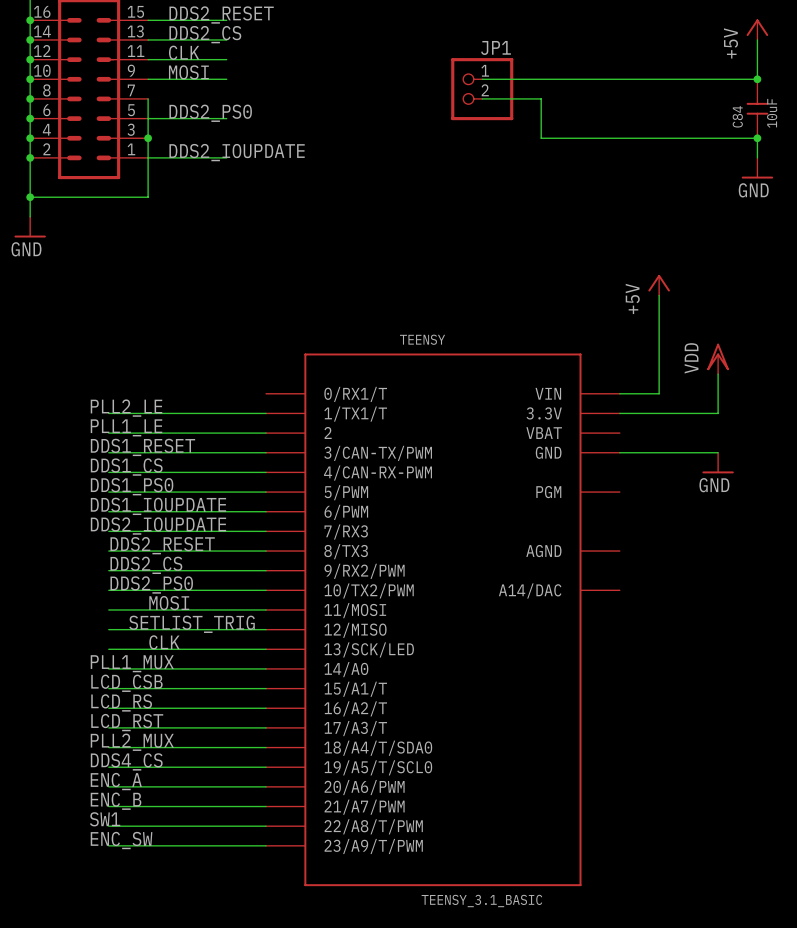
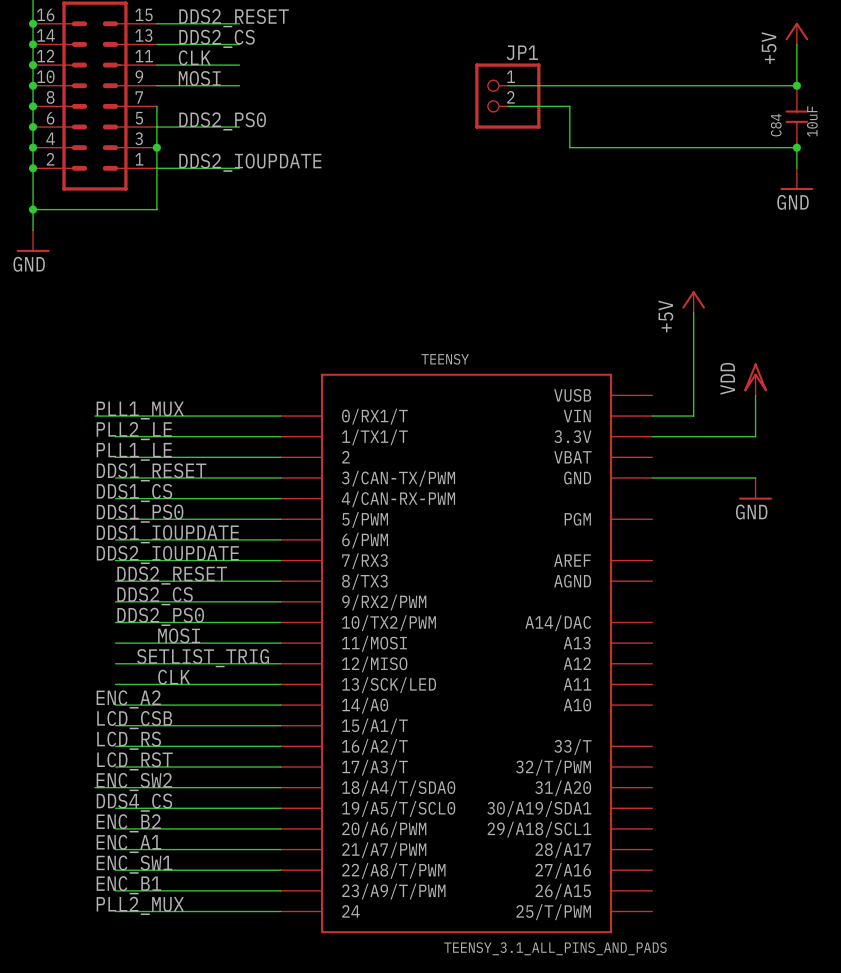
TEENSY symbol: [266, 353, 620, 887] -> [280, 373, 653, 934]
label: none -> PLL1_MUX (140, 410)
wire: none -> (94, 416) (280, 416)
label: PLL1_MUX (132, 663) -> ENC_A2 (128, 699)
label: PLL2_MUX (132, 742) -> ENC_SW2 (134, 782)
wire: none -> (94, 787) (115, 787)
label: ENC_A (116, 781) -> ENC_B2 (128, 823)
label: ENC_B (116, 801) -> ENC_A1 (128, 843)
label: SW1 (105, 819) -> ENC_SW1 (134, 864)
label: ENC_SW (121, 840) -> ENC_B1 (128, 885)
label: none -> PLL2_MUX (140, 905)
wire: none -> (115, 911) (280, 911)
TEENSY value: TEENSY_3.1_BASIC (481, 901) -> TEENSY_3.1_ALL_PINS_AND_PADS (555, 948)

